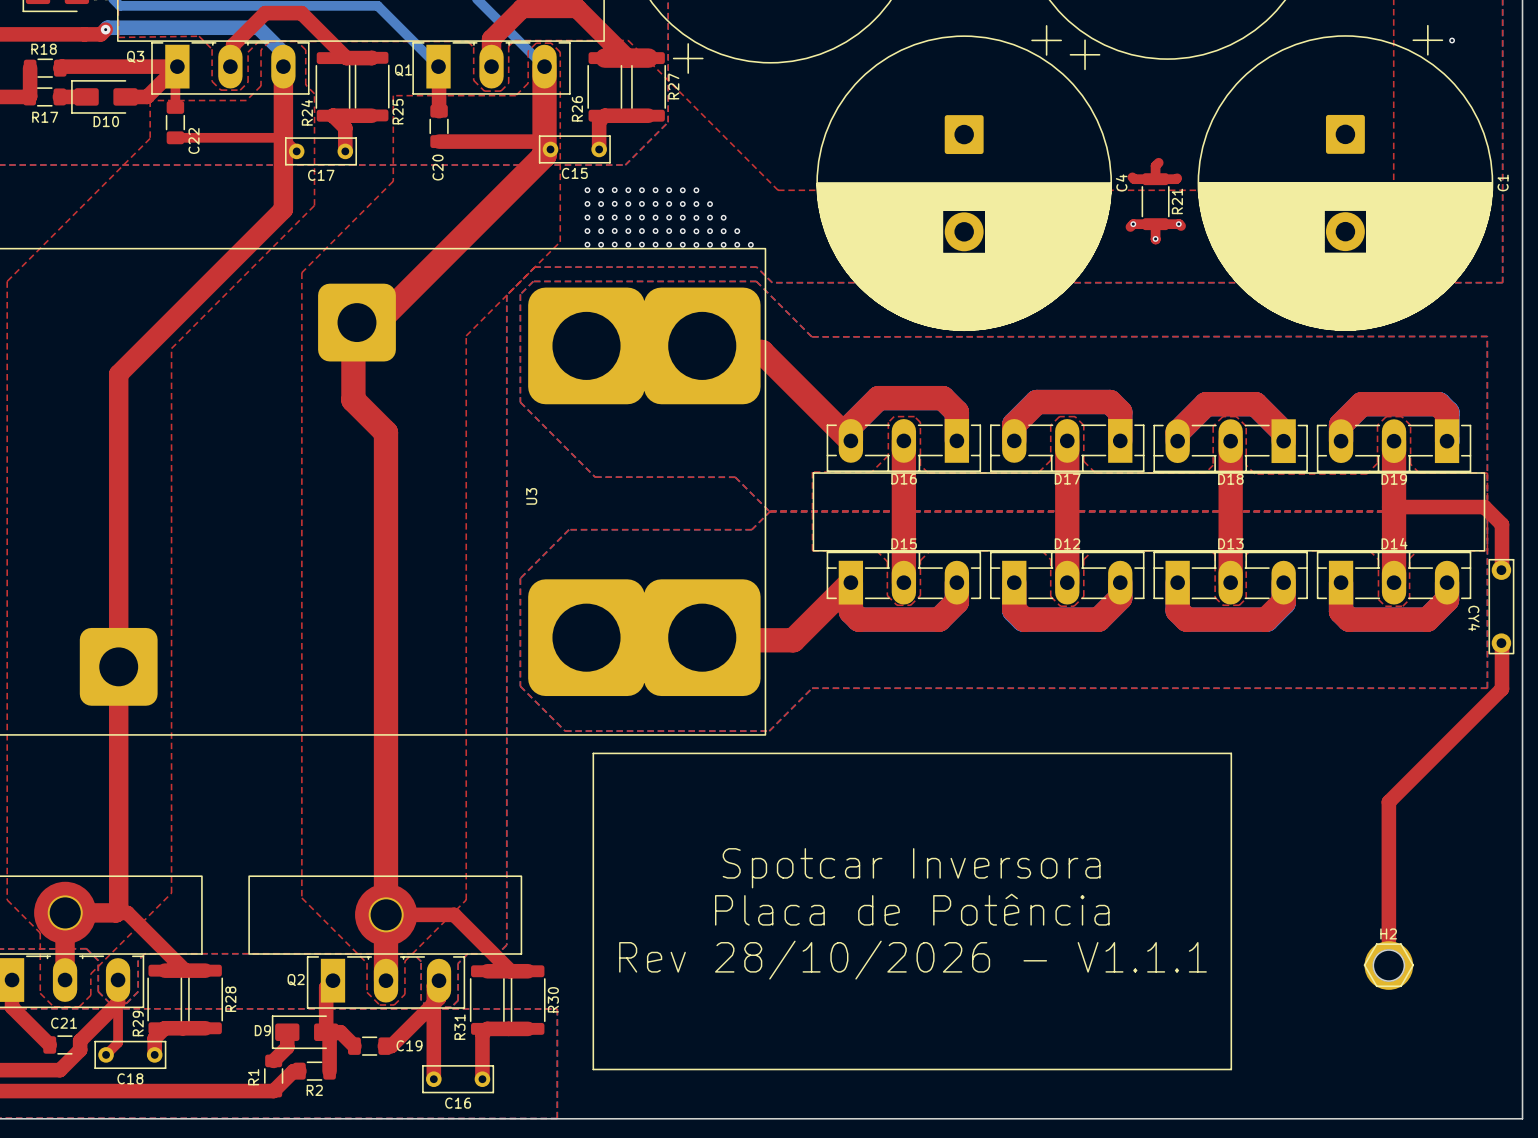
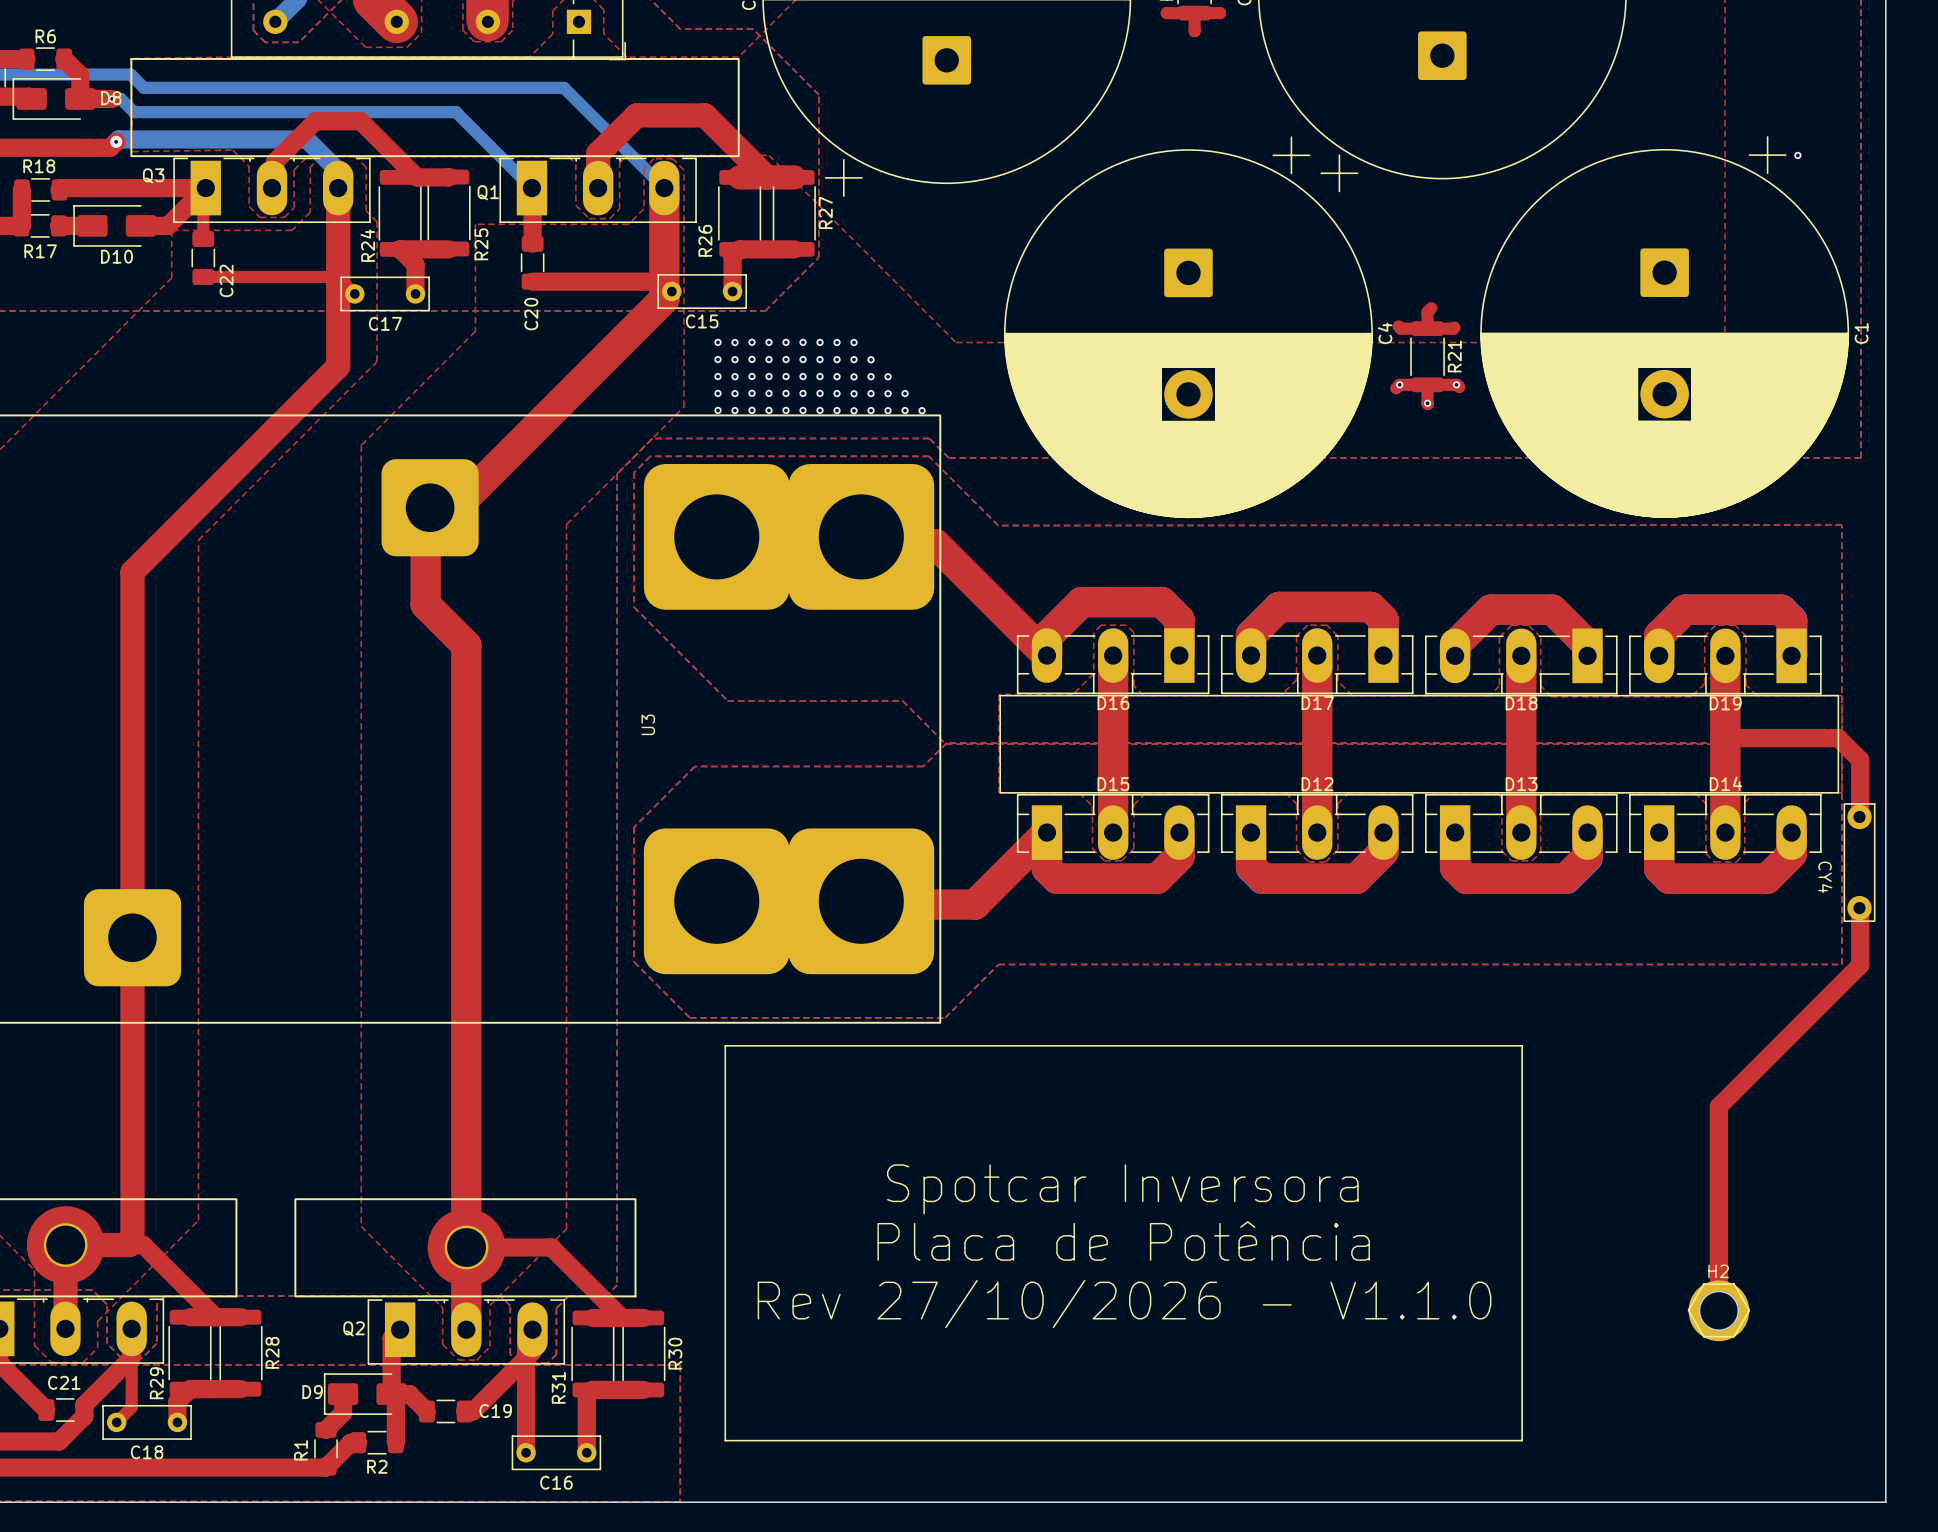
text: Rev 28/10/2026 - V1.1.1 (913, 960) -> Rev 27/10/2026 - V1.1.0 (1124, 1304)

